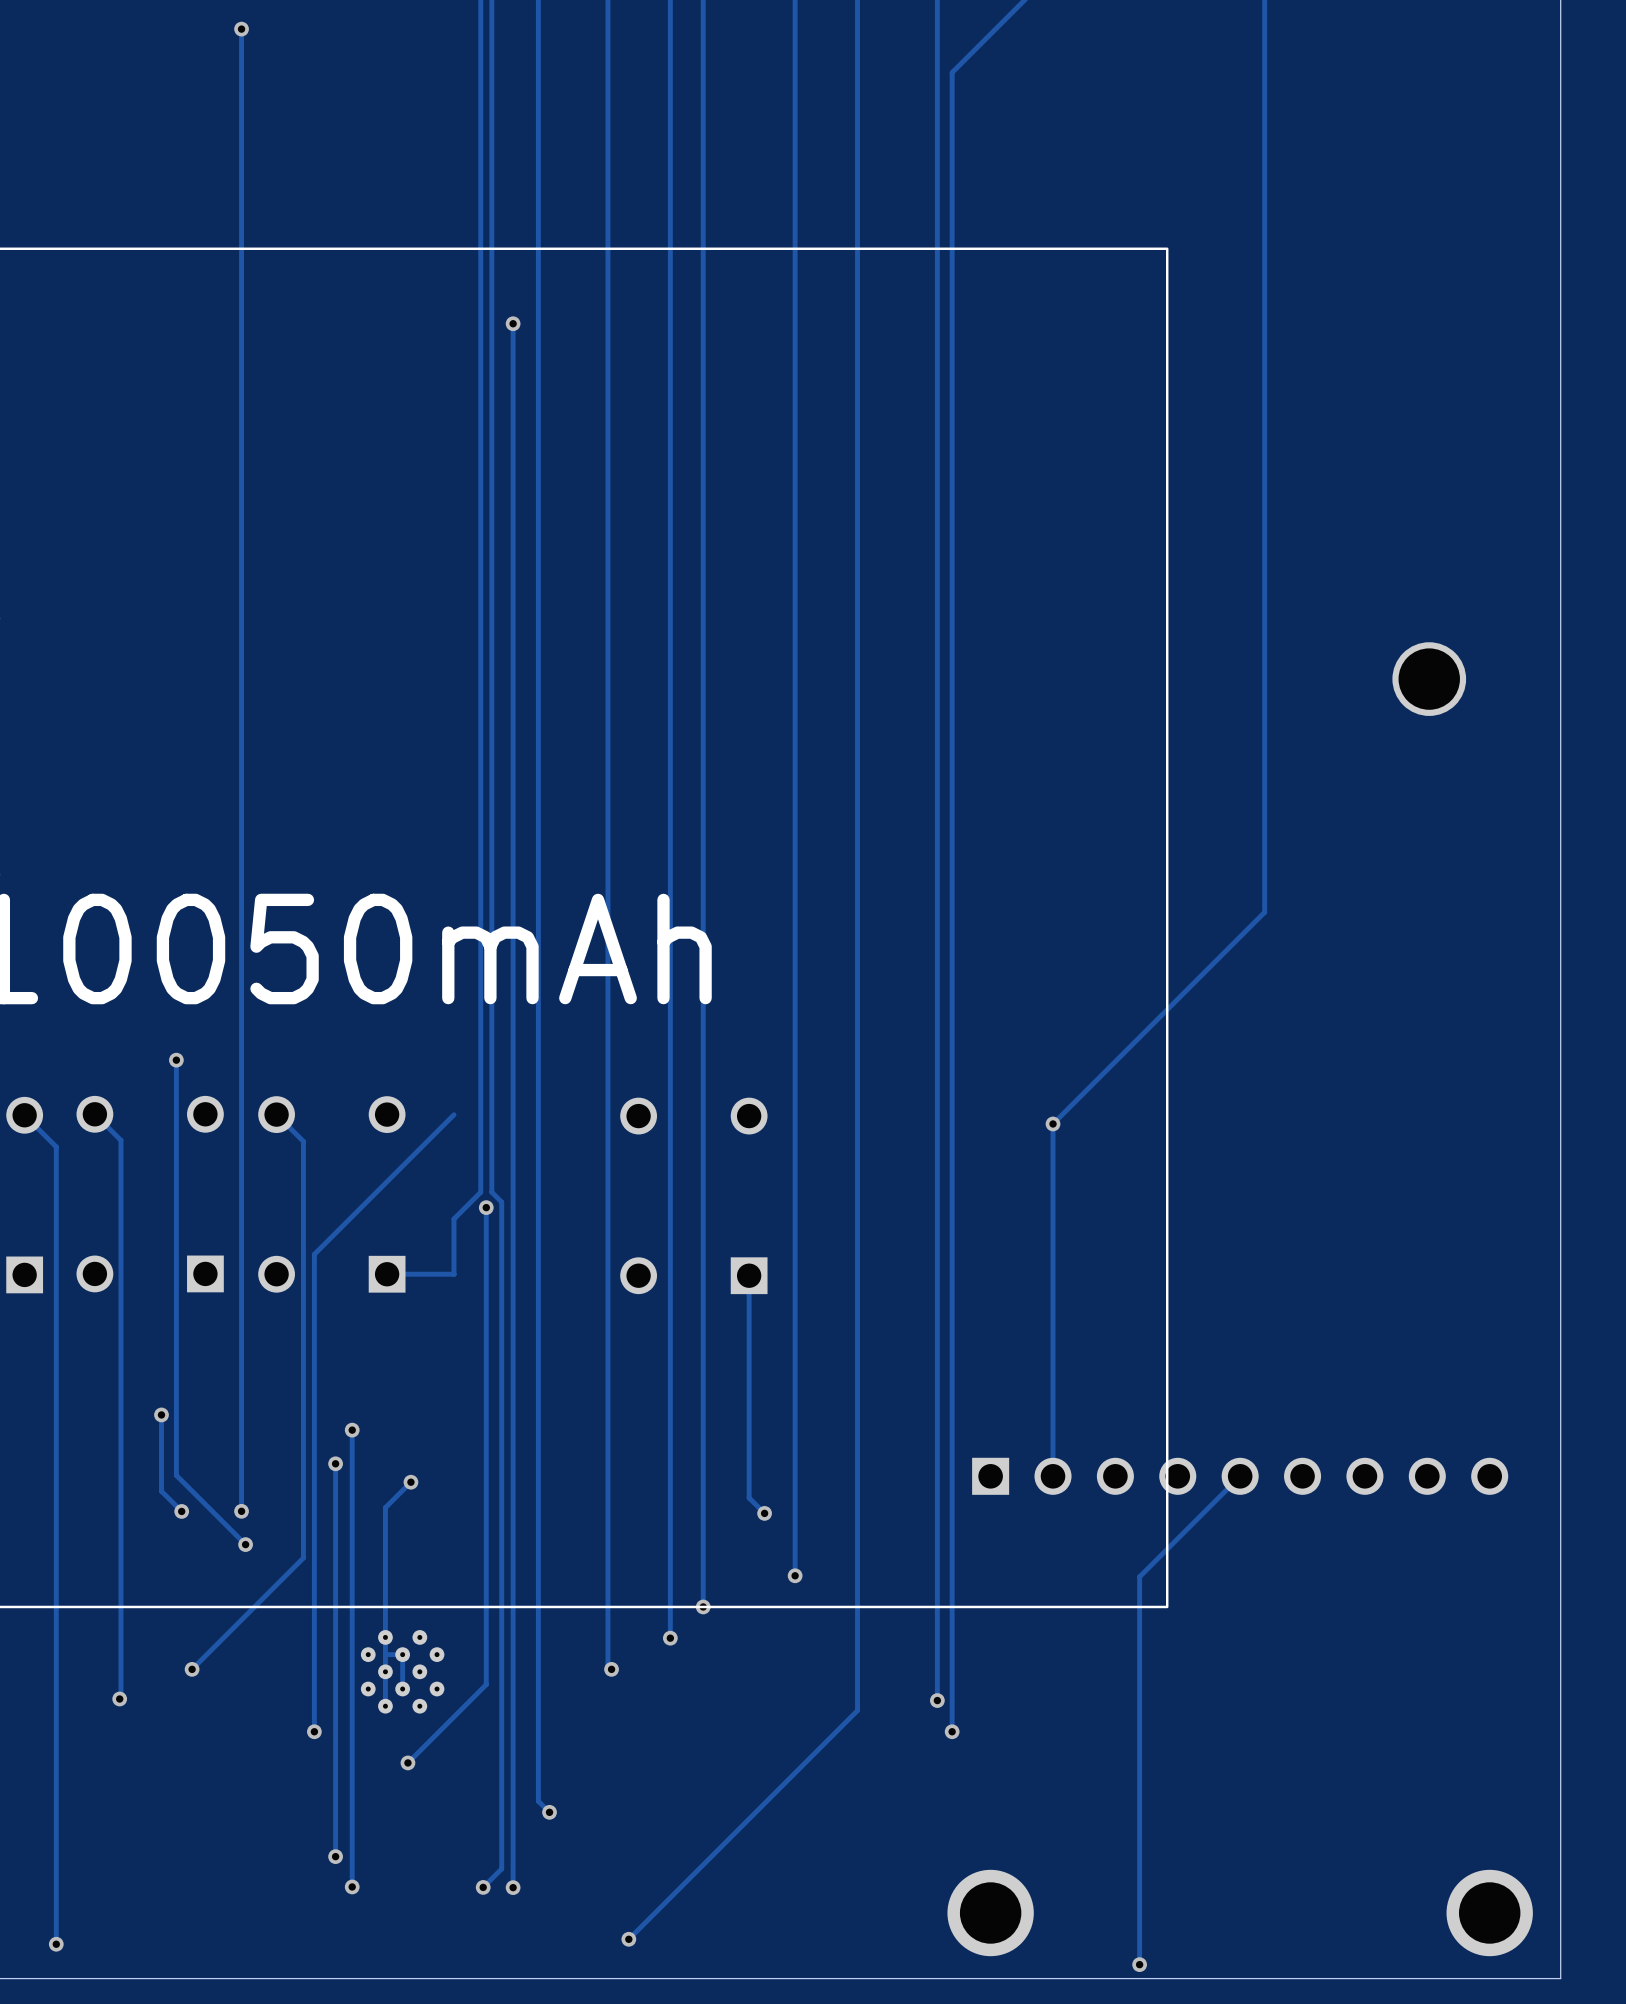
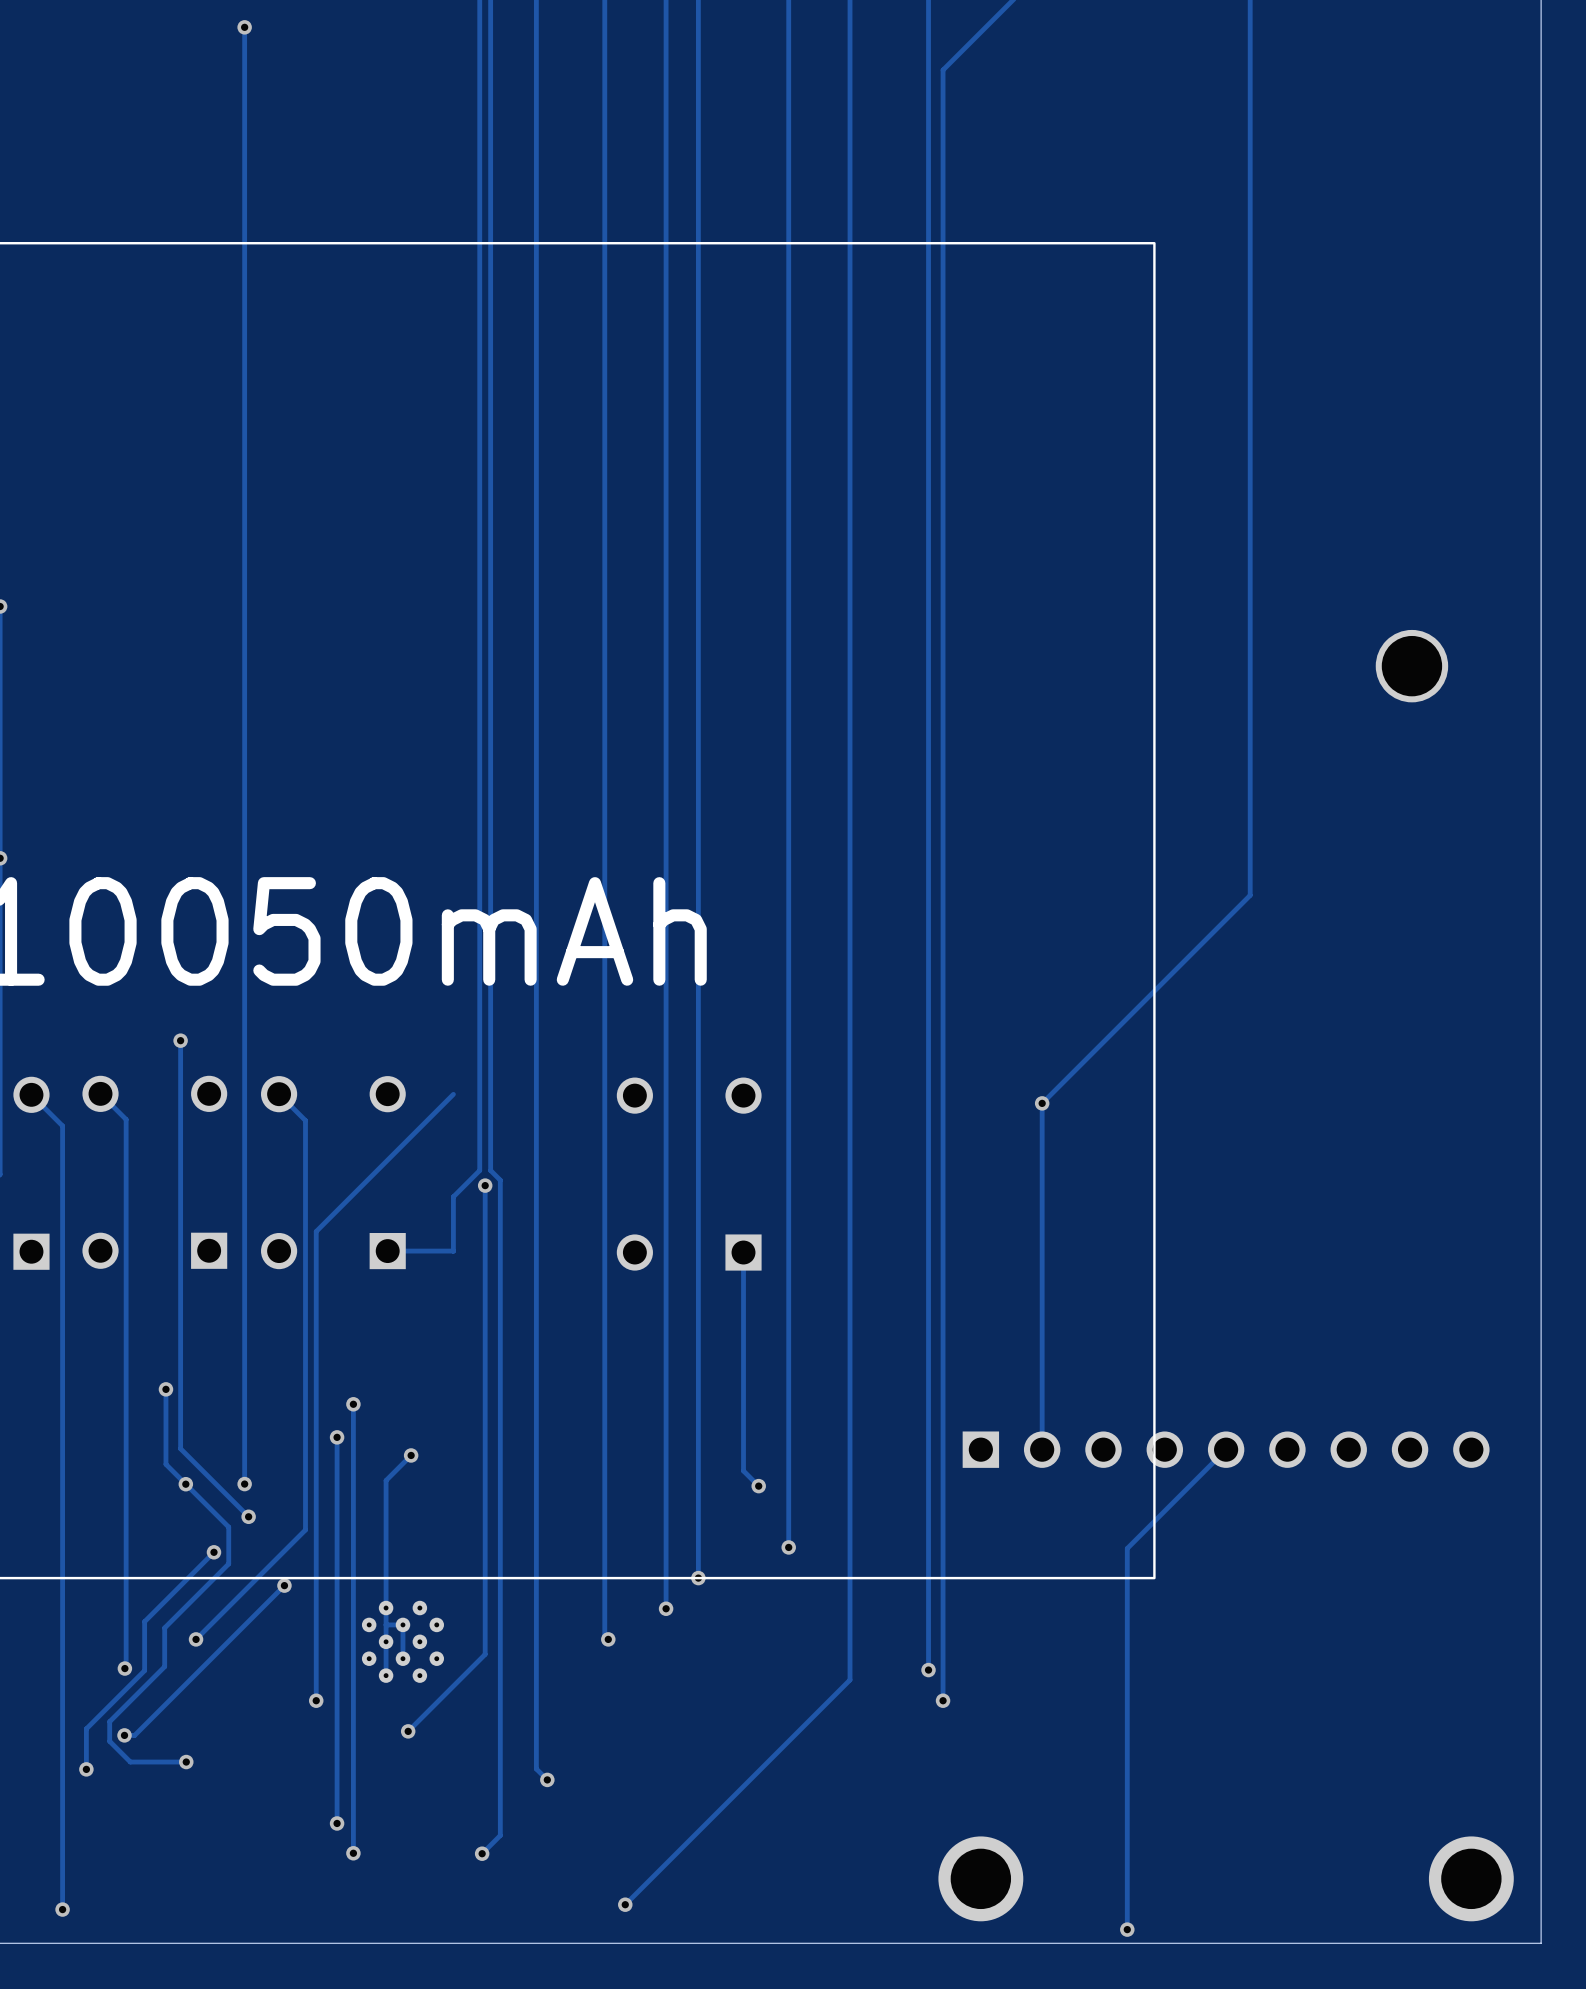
track: (513, 323) (513, 1887) -> none
via: (513, 323) -> none
track: none -> (185, 1484) (228, 1527) (228, 1563) (164, 1627) (164, 1666) (109, 1721) (109, 1741) (130, 1762) (186, 1762)
track: none -> (213, 1552) (144, 1621) (144, 1670) (86, 1728) (86, 1769)
via: none -> (213, 1552)
track: none -> (284, 1585) (134, 1735) (124, 1735)
via: none -> (284, 1585)
via: none -> (124, 1735)
via: none -> (186, 1762)
via: none -> (86, 1769)
via: (513, 1887) -> none

